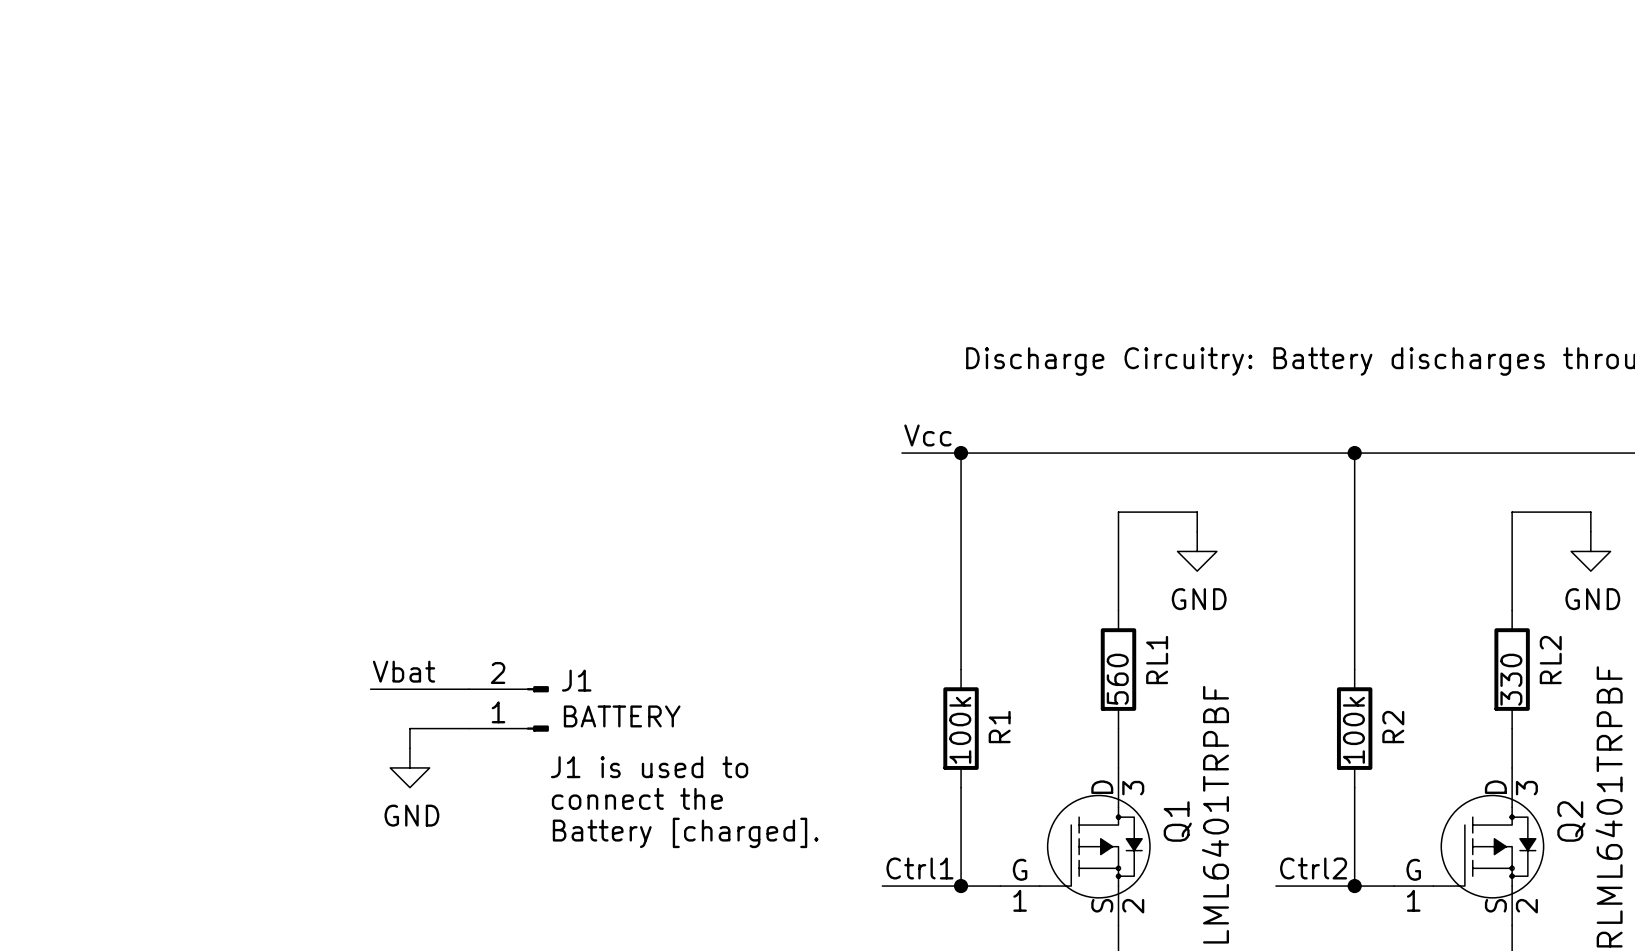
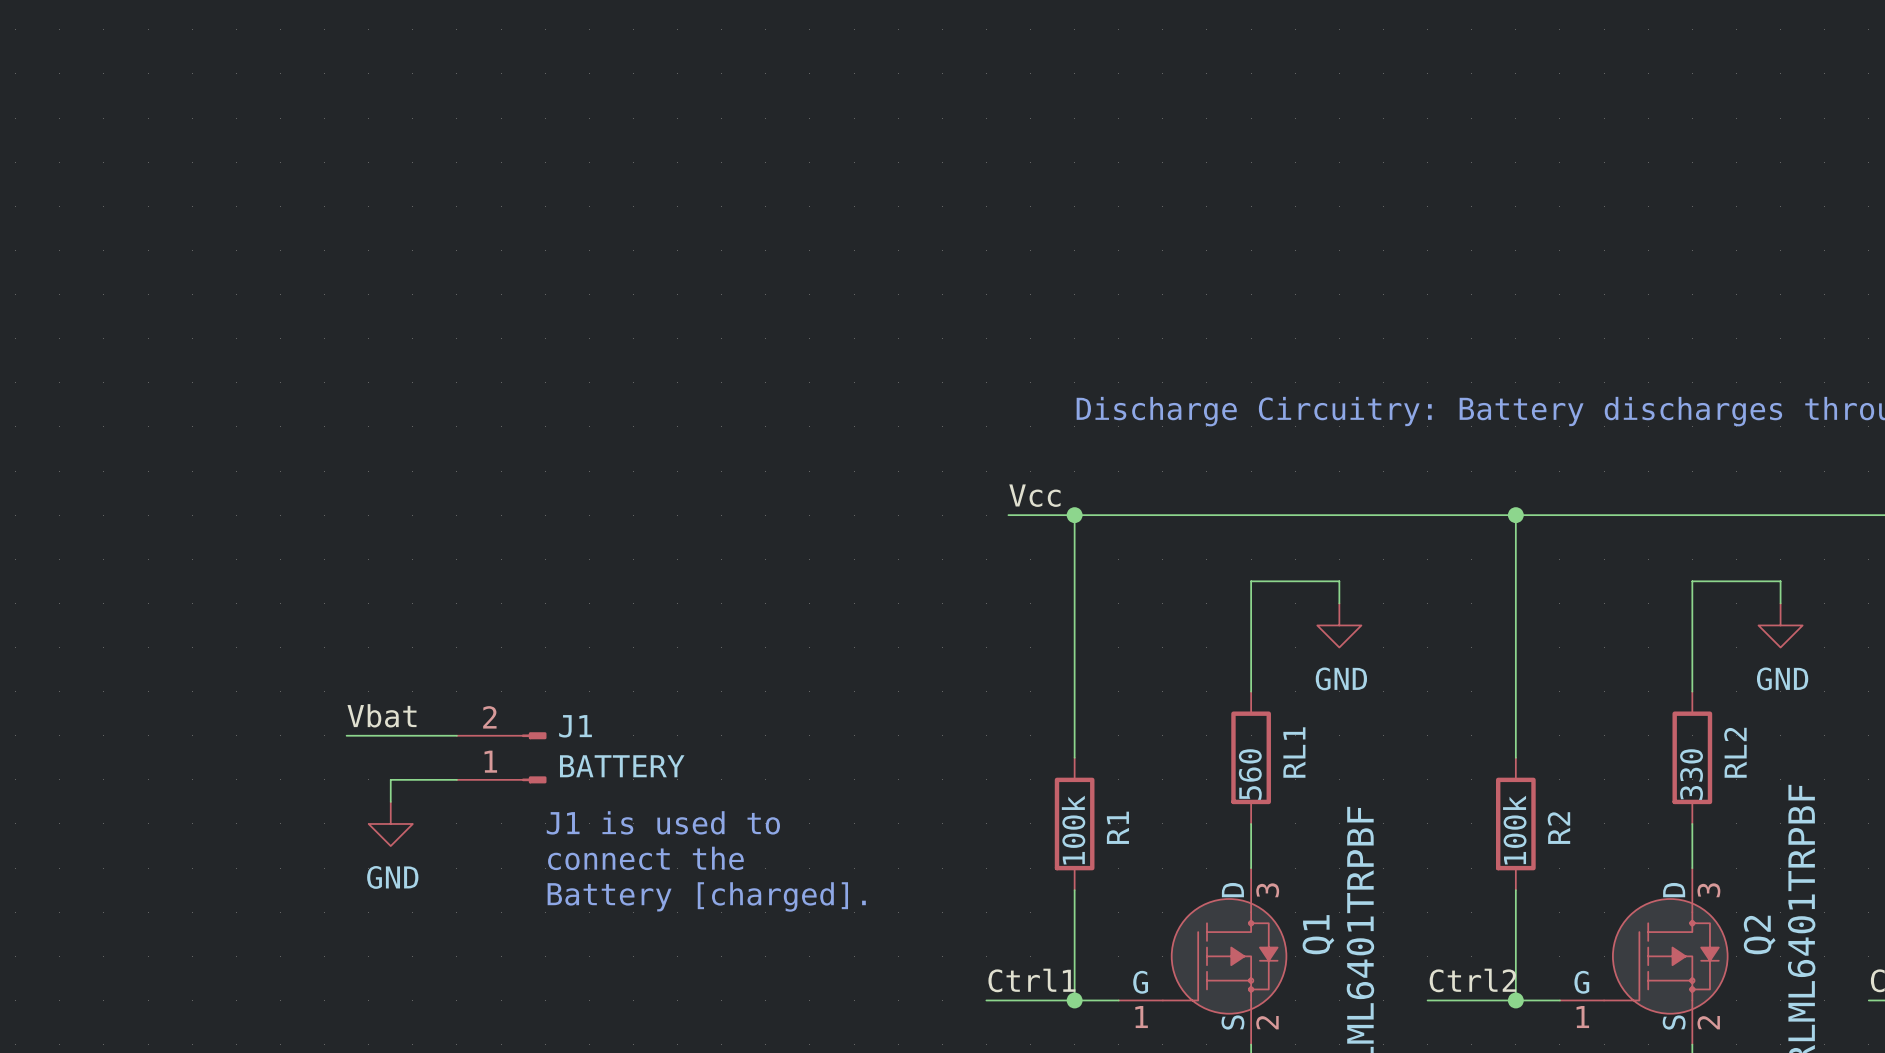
wire: none -> (346, 735) (456, 735)
label position: Vbat (404, 671) -> Vbat (382, 715)
wire: none -> (412, 779) (390, 779) (390, 801)
J1 position: (508, 708) -> (501, 757)
wire: (469, 728) (409, 728) (409, 748) -> none
power symbol position: GND (409, 767) -> GND (390, 823)
text position: J1 is used to (649, 767) -> J1 is used to (663, 822)
text position: connect the (637, 798) -> connect the (645, 858)
text position: Battery [charged]. (685, 832) -> Battery [charged]. (706, 896)

